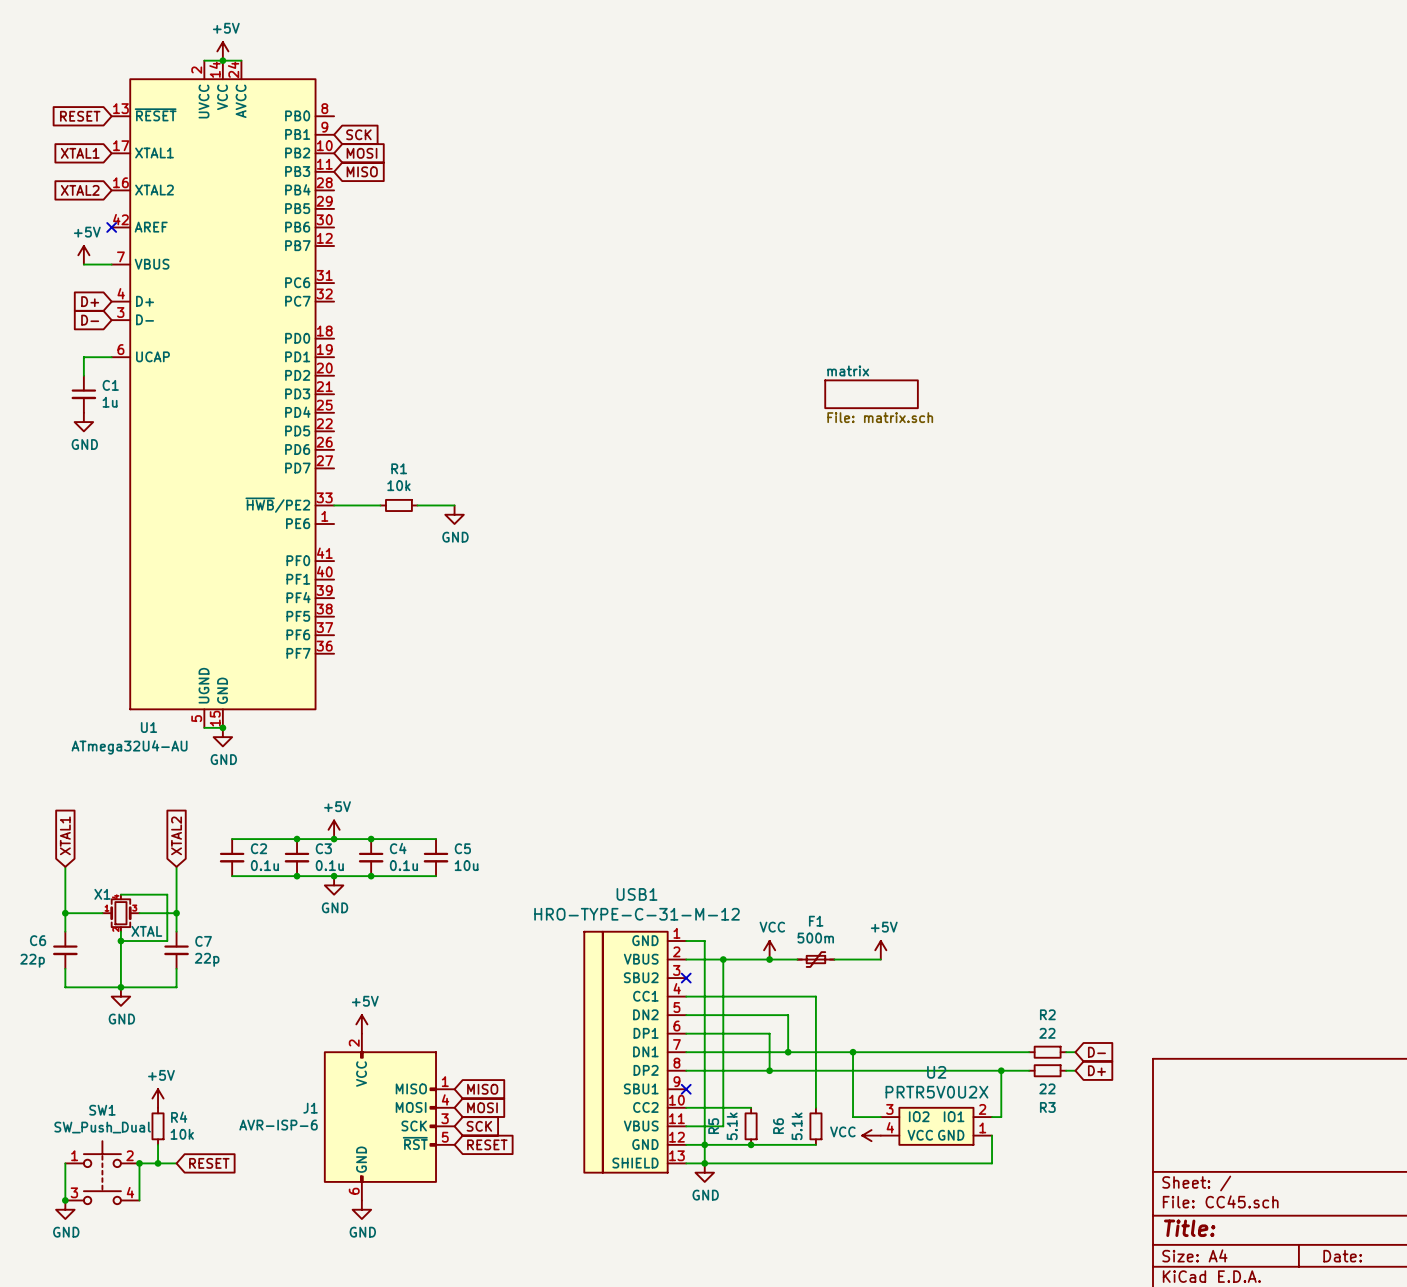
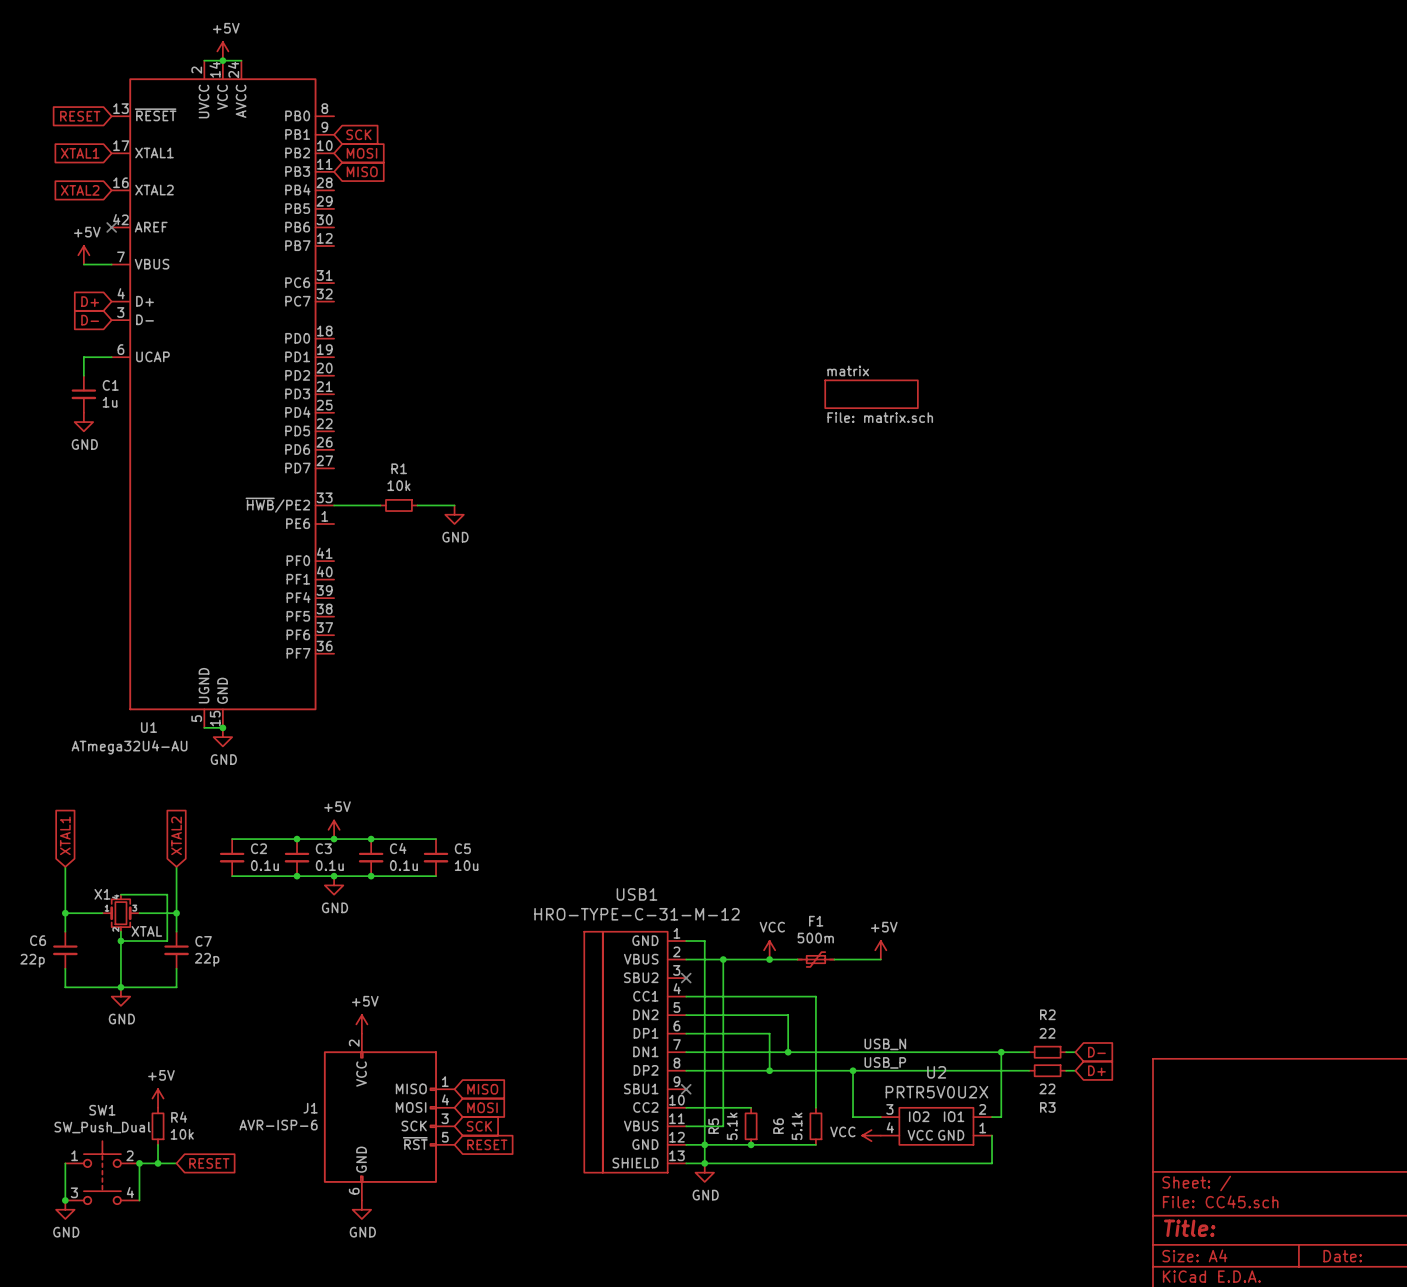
label: none -> USB_N (885, 1044)
wire: (853, 1052) (853, 1070) -> (1001, 1052) (1001, 1070)
junction position: (853, 1052) -> (853, 1070)
label: none -> USB_P (885, 1062)
junction position: (1001, 1070) -> (1001, 1052)

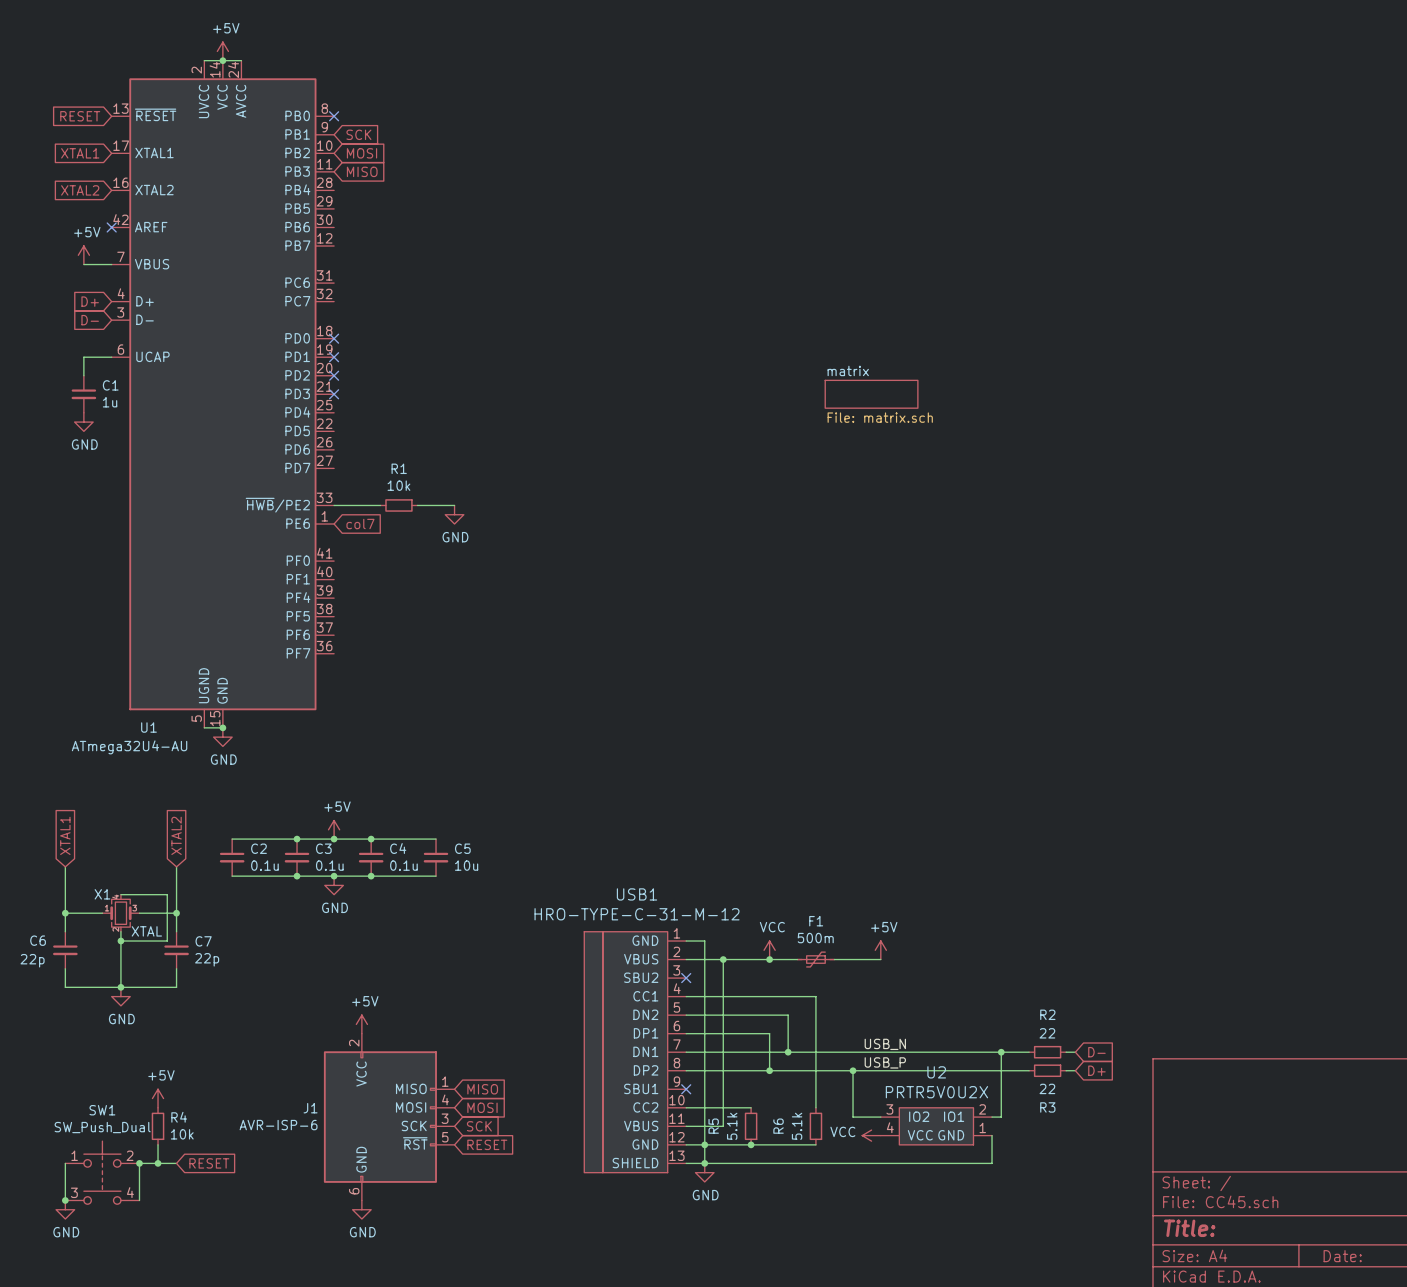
no-connect mark: none -> (334, 116)
no-connect mark: none -> (334, 338)
no-connect mark: none -> (334, 357)
no-connect mark: none -> (334, 375)
no-connect mark: none -> (334, 394)
global label: none -> col7 (360, 524)

